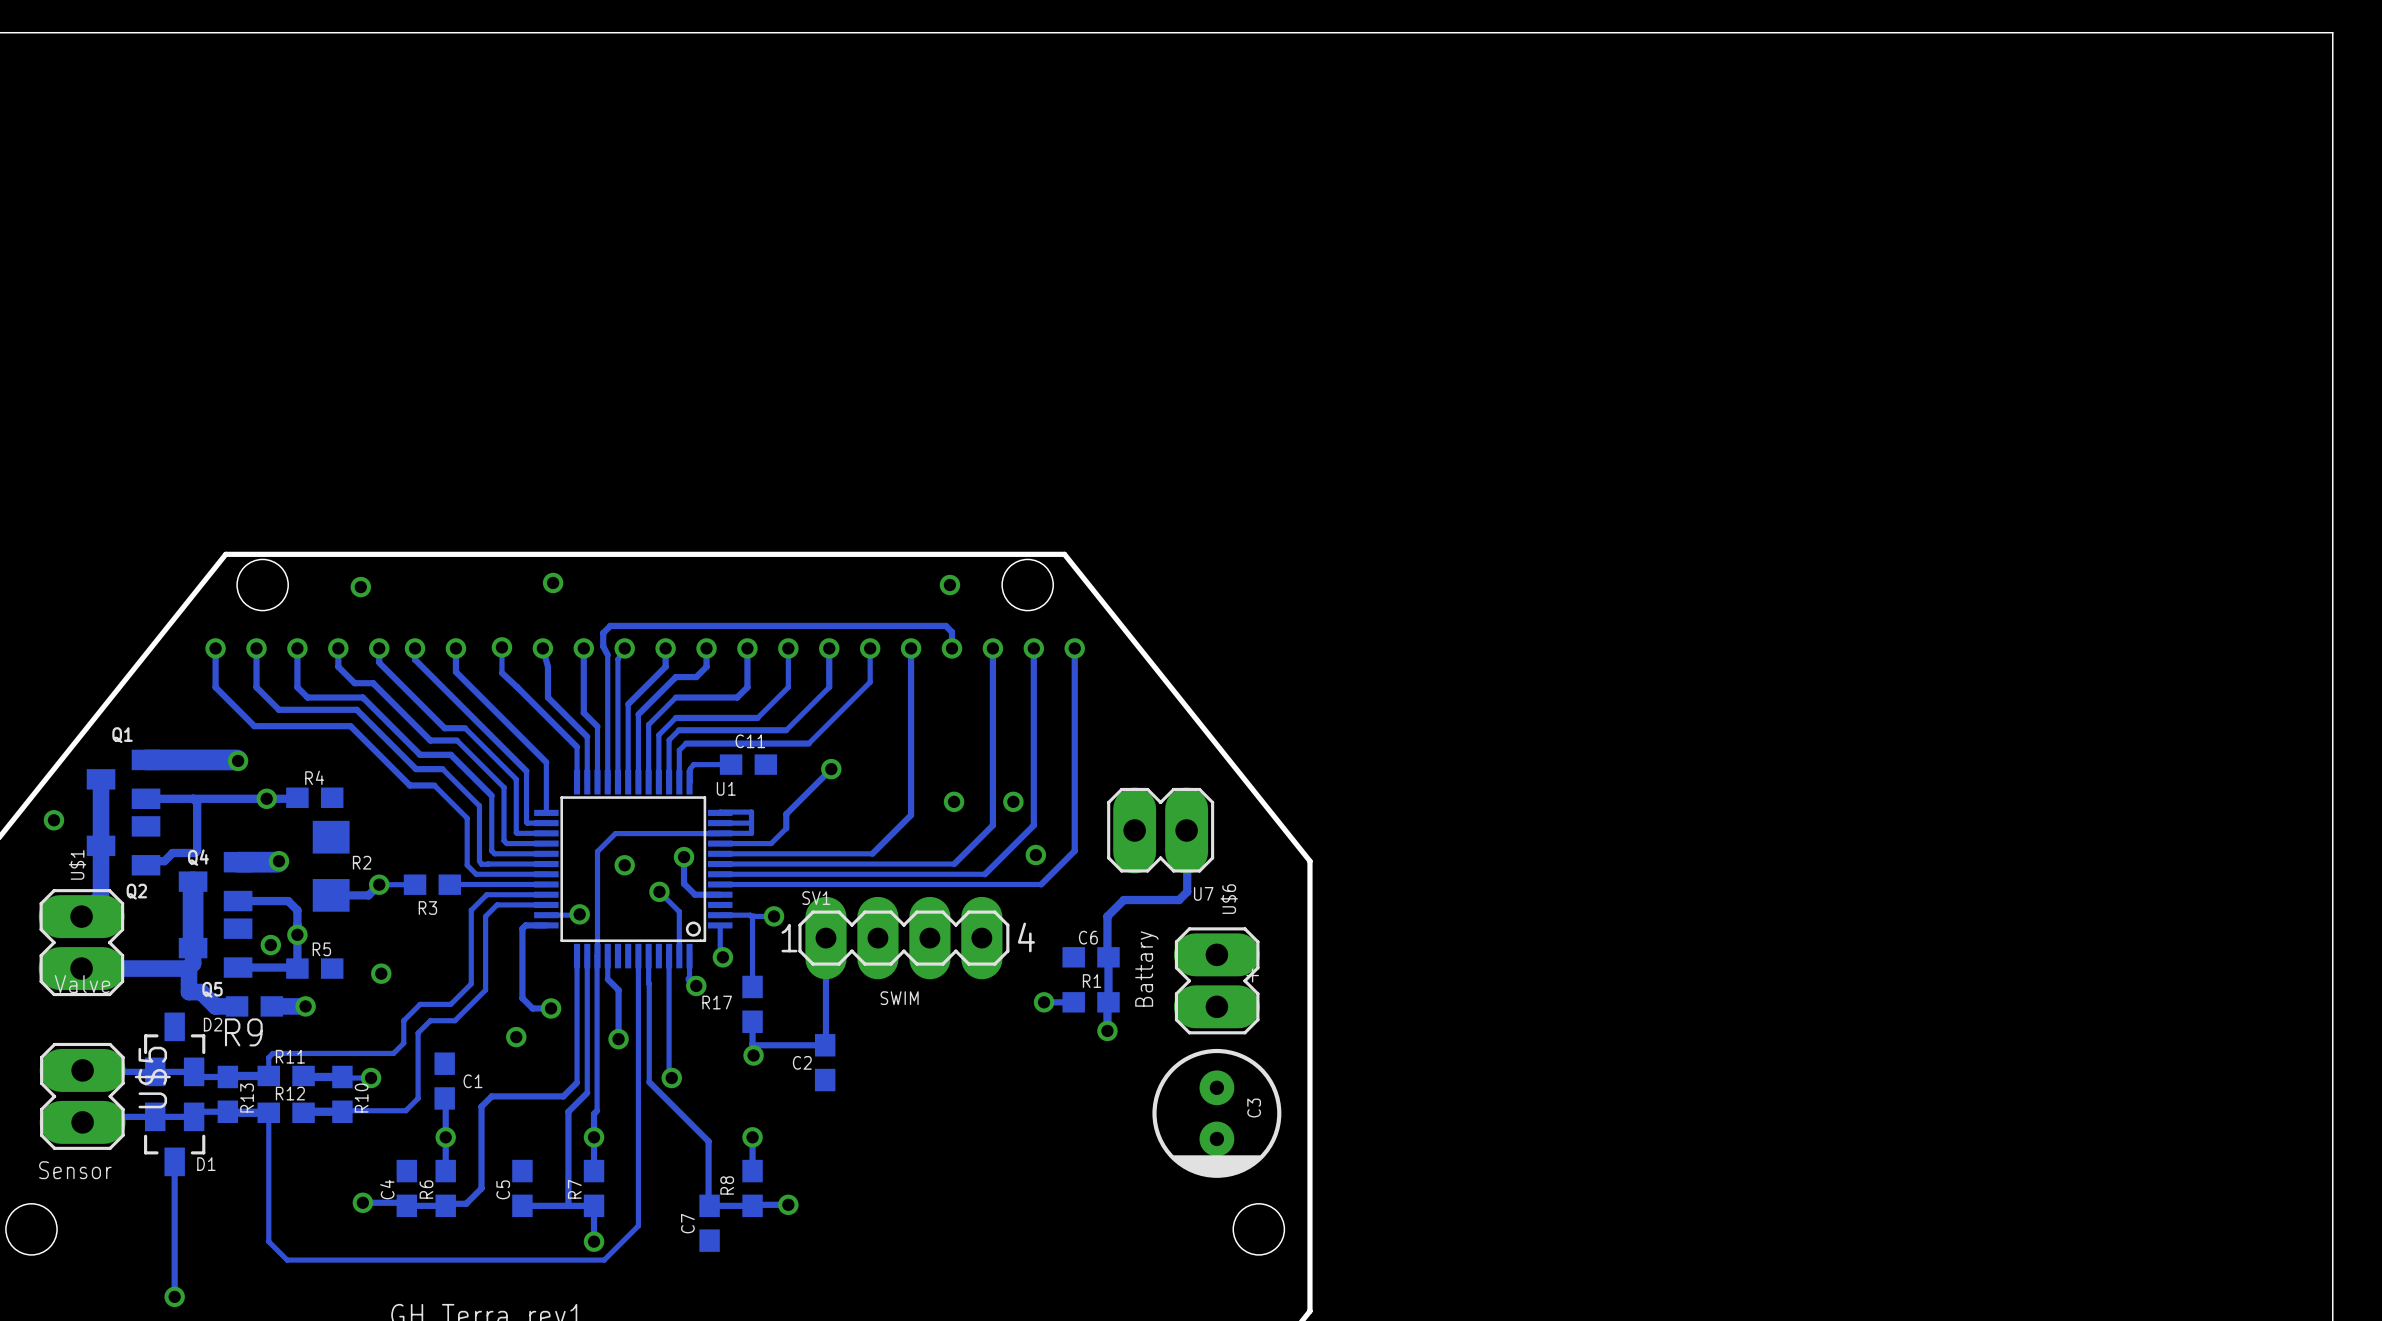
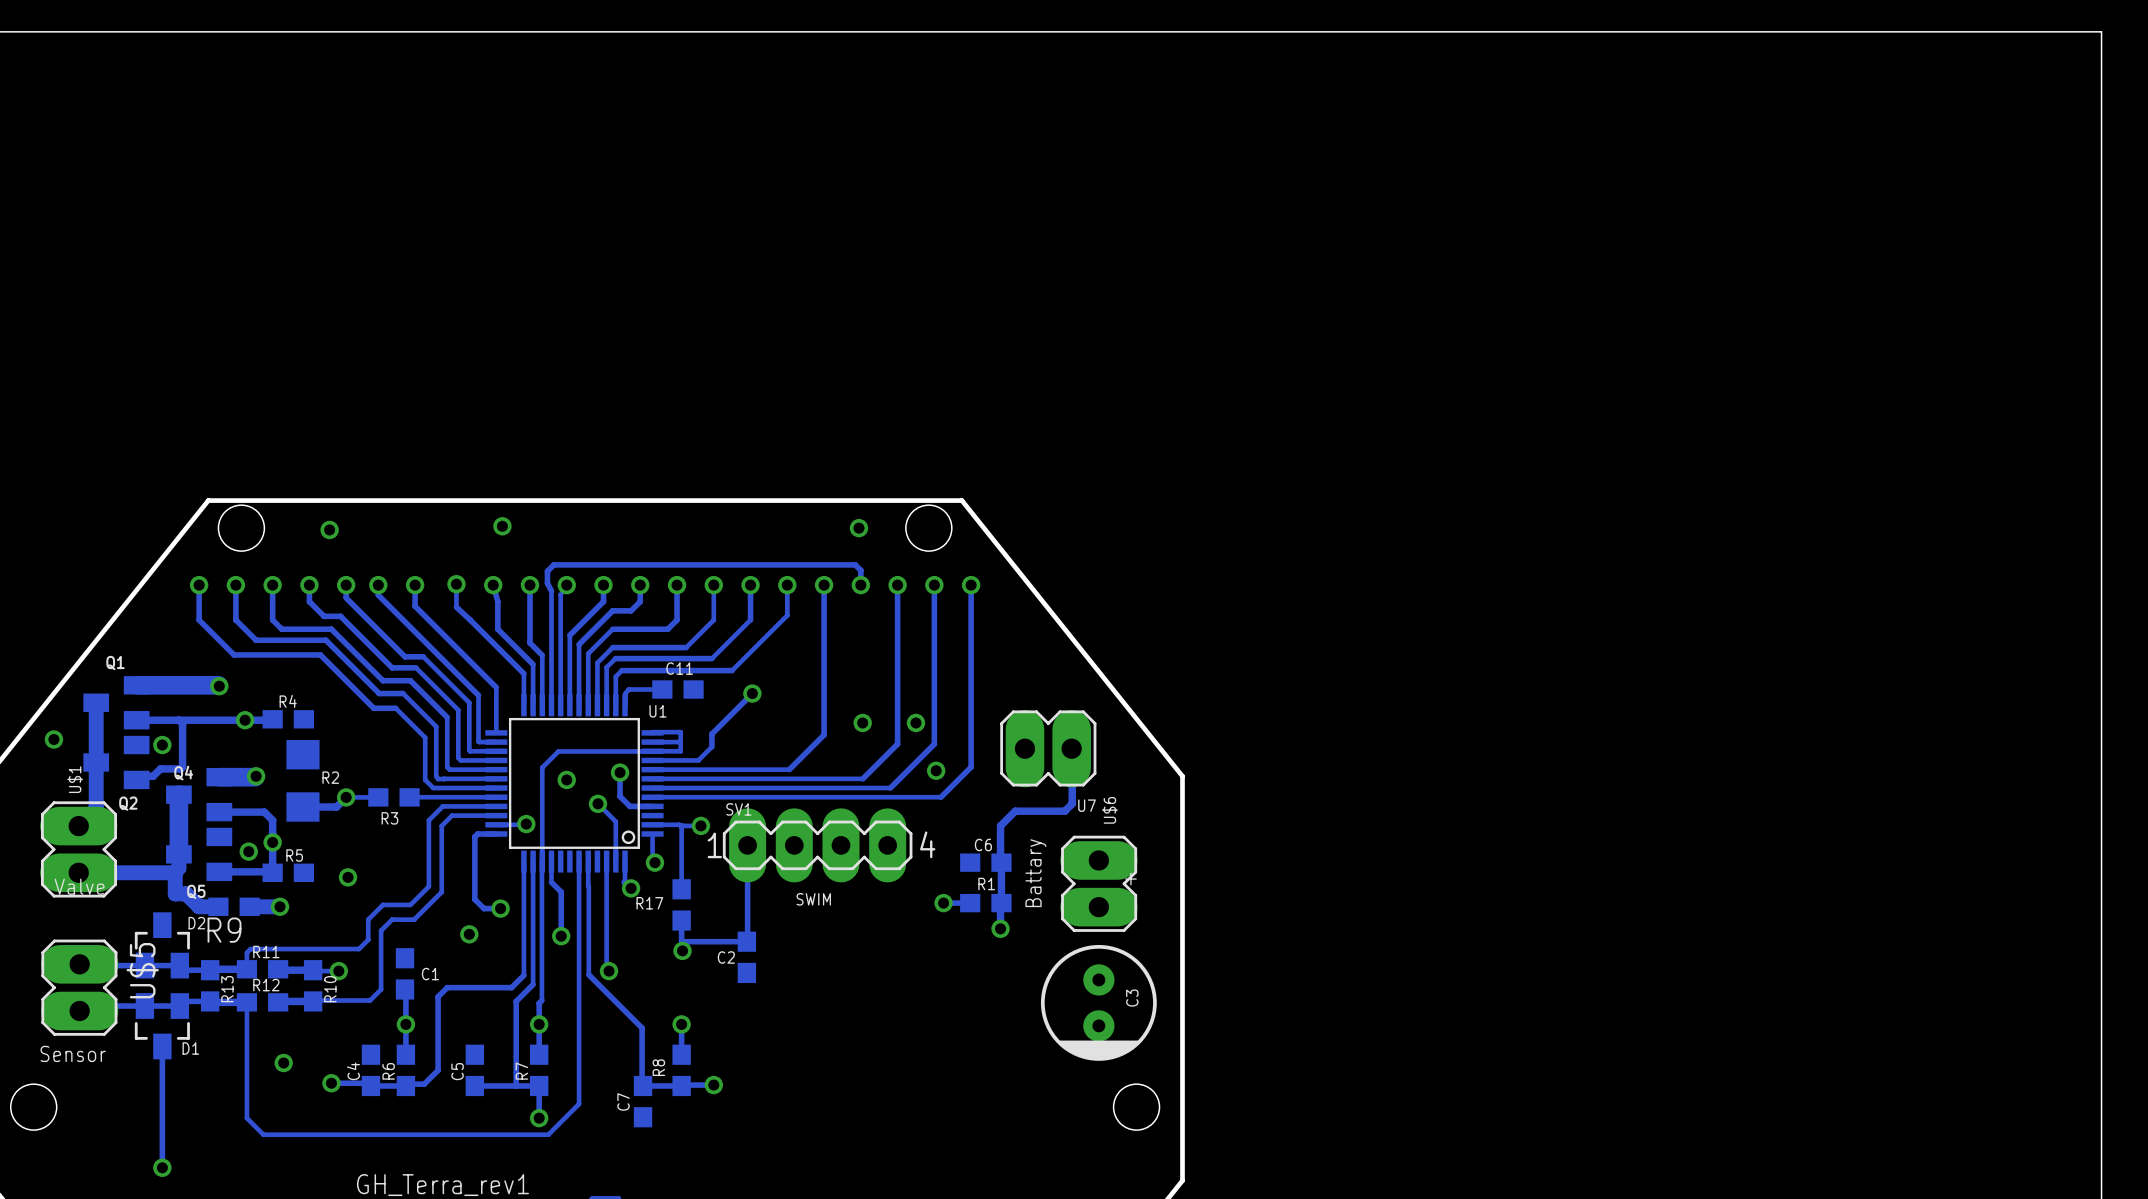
via: none -> (162, 745)
via: none -> (283, 1063)

